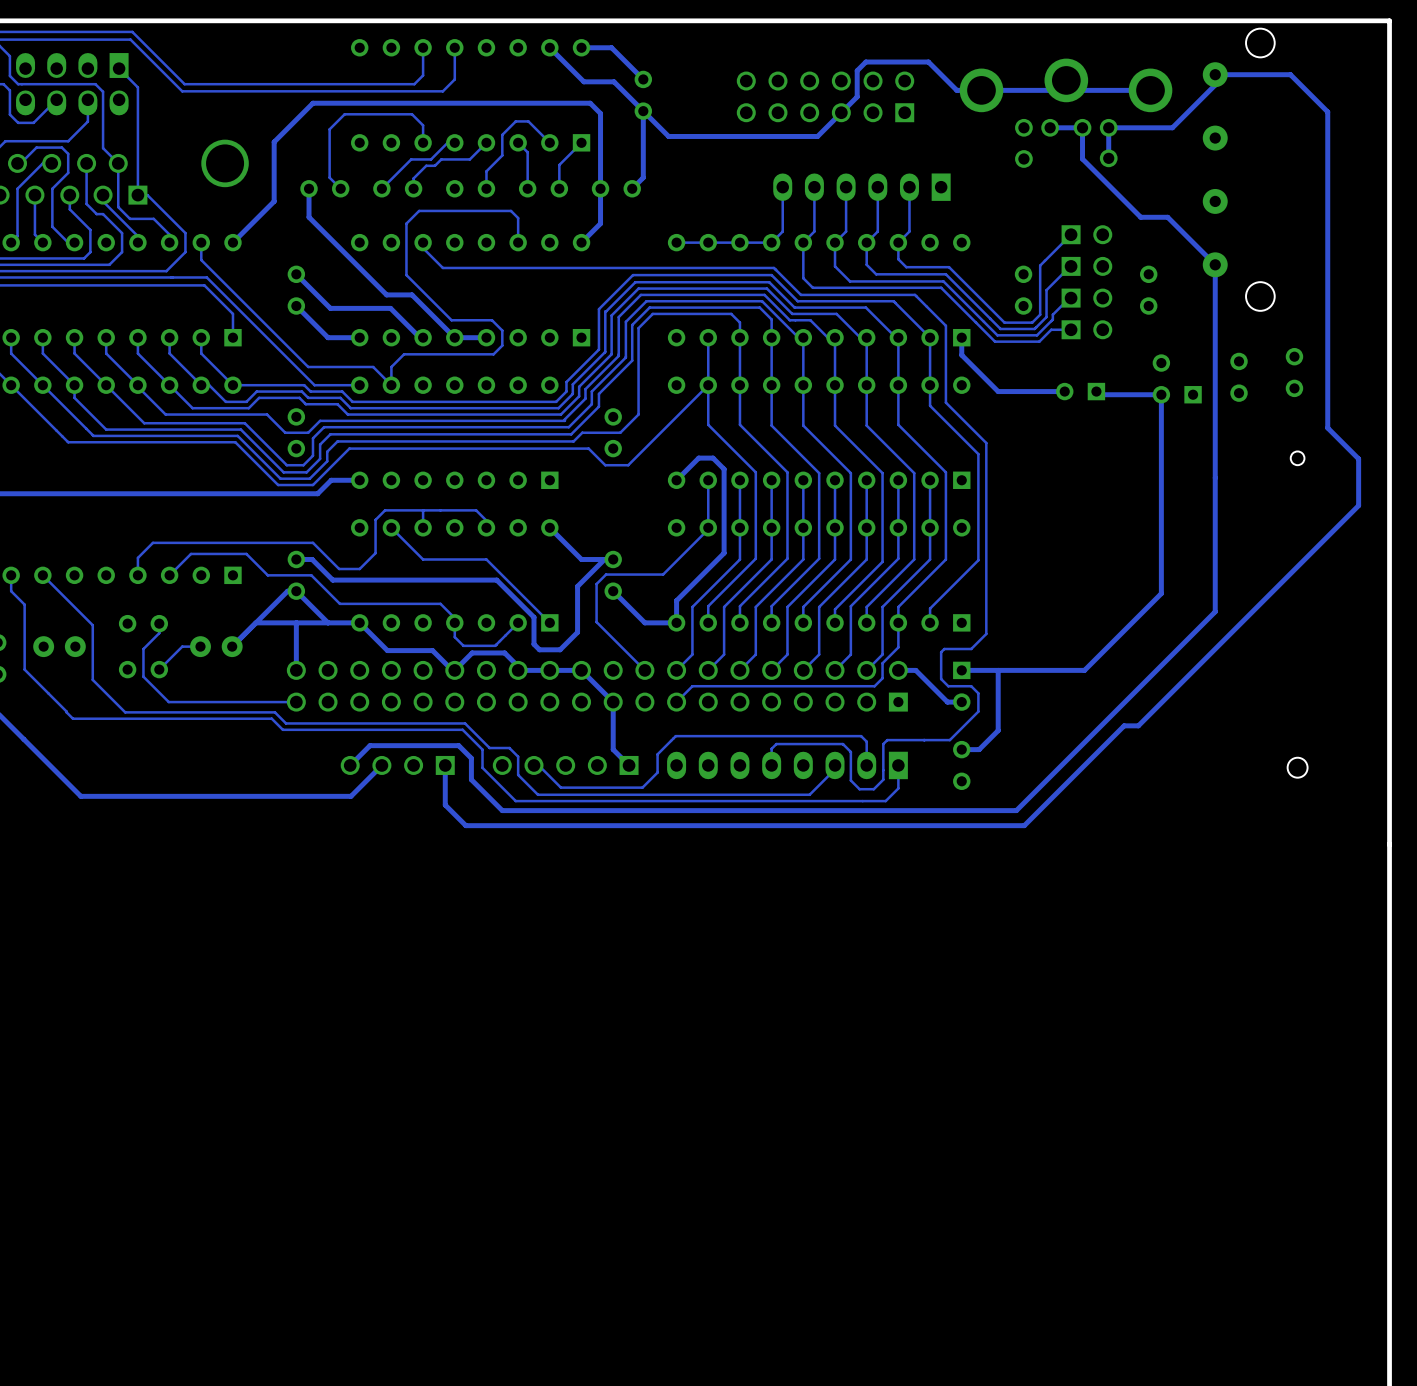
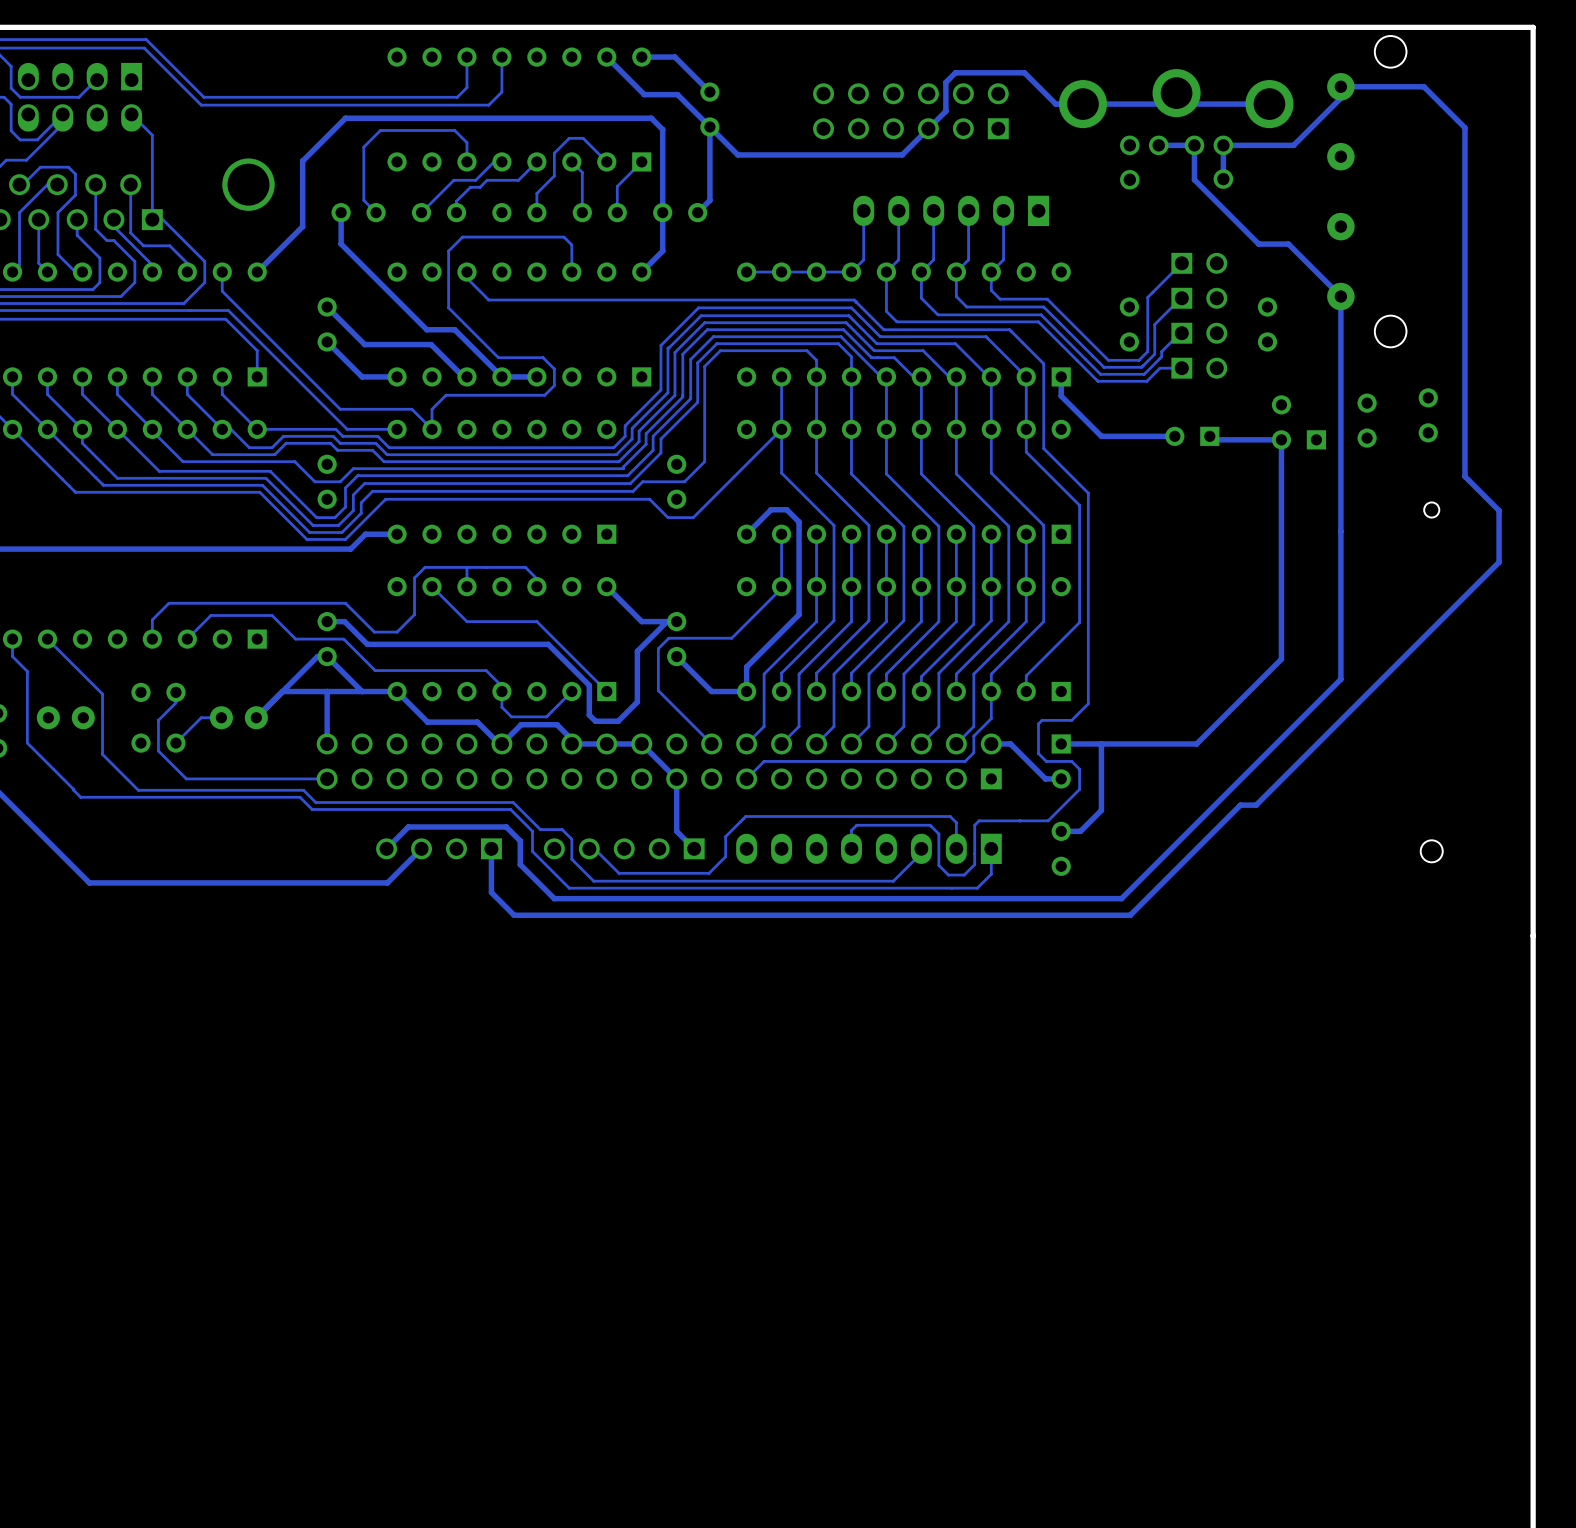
track: (119, 68) (137, 87) (137, 118) -> (131, 114) (152, 135)
track: (71, 84) (95, 84) (103, 91) (103, 148) (118, 163) -> (78, 97) (97, 80)
track: (87, 99) (87, 121) (68, 141) (23, 141) -> (62, 114) (62, 123) (26, 160)

